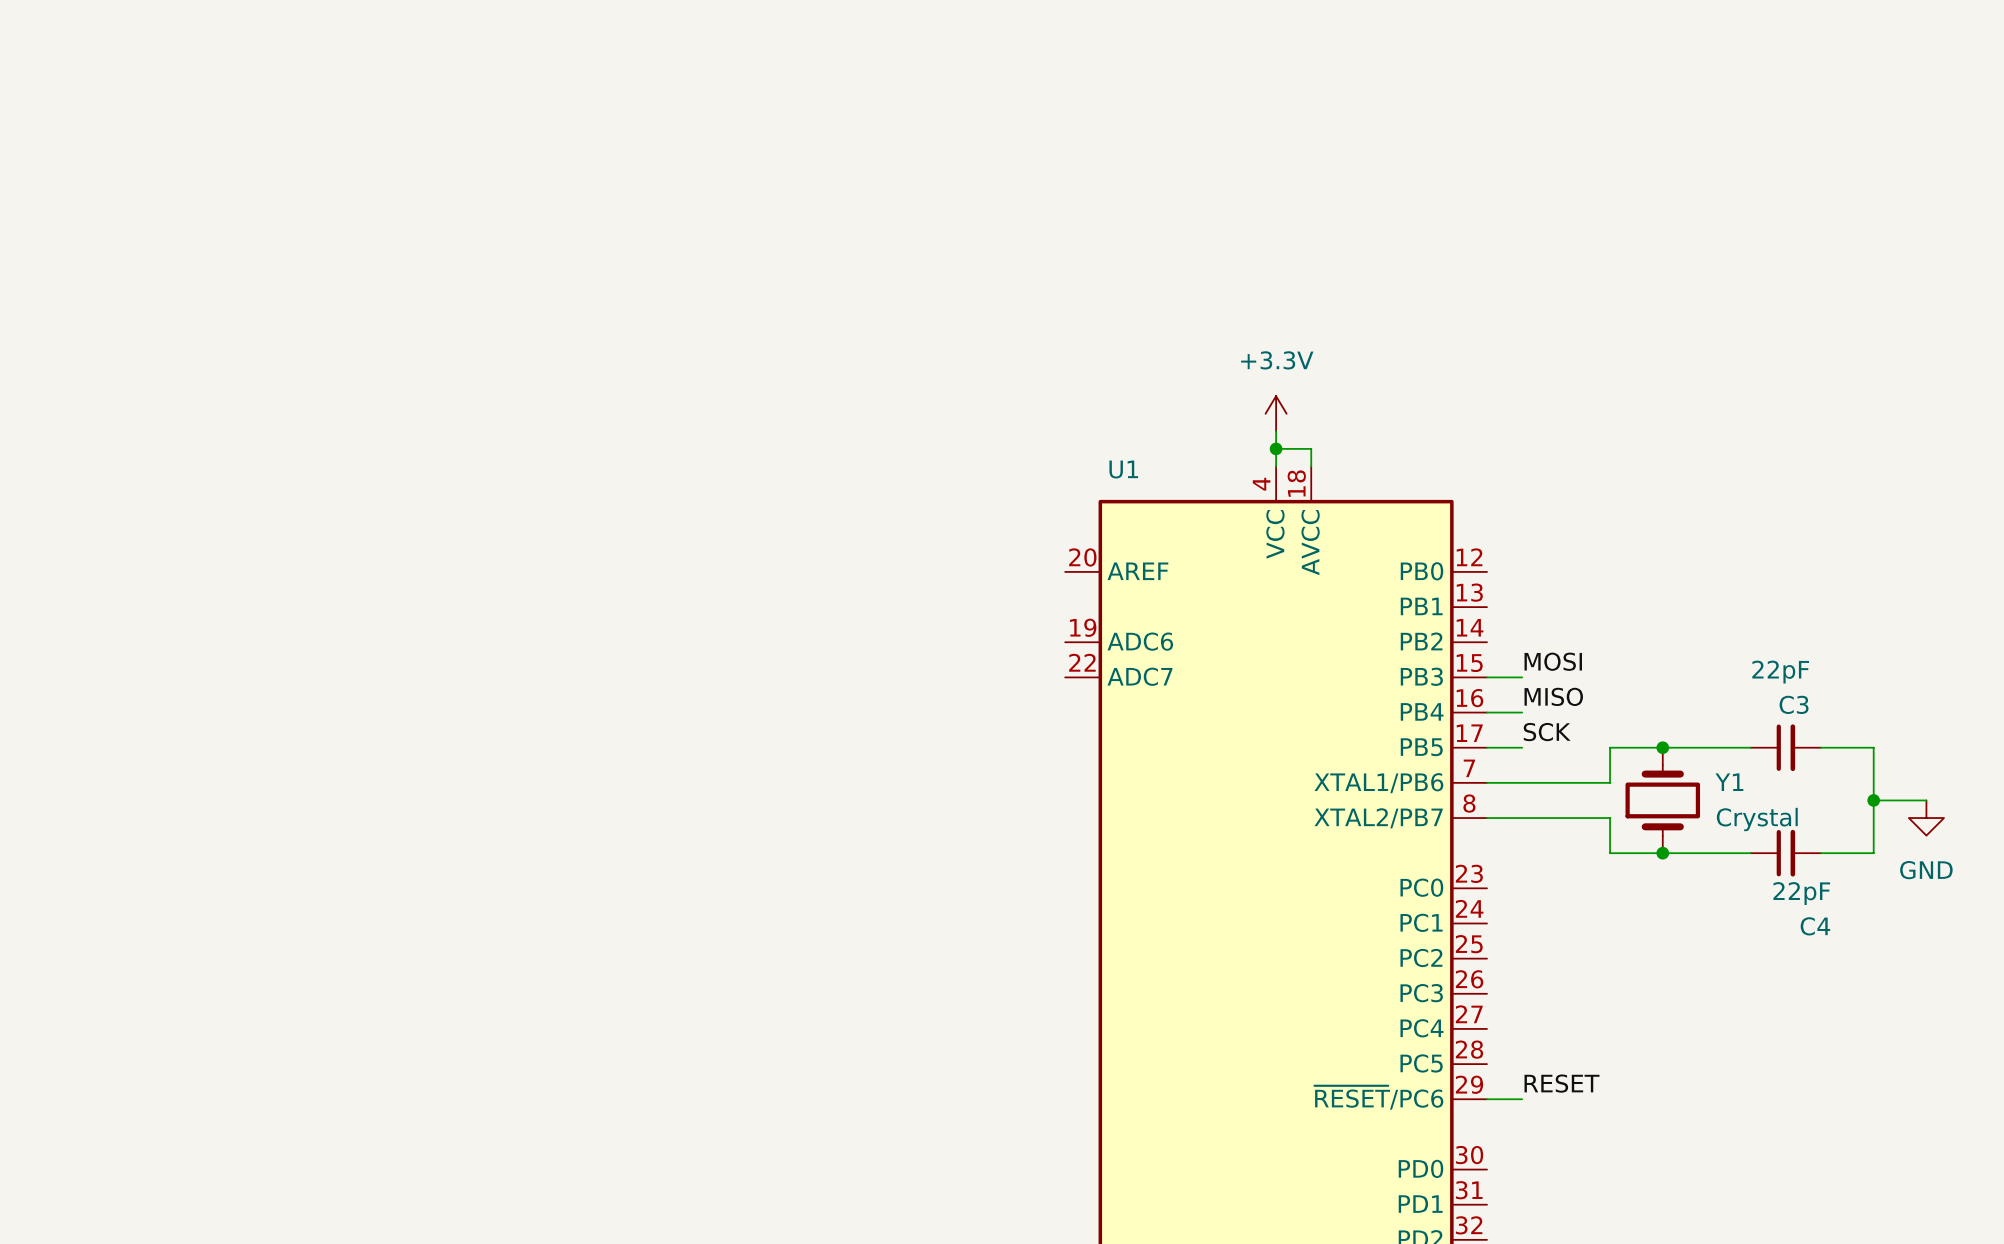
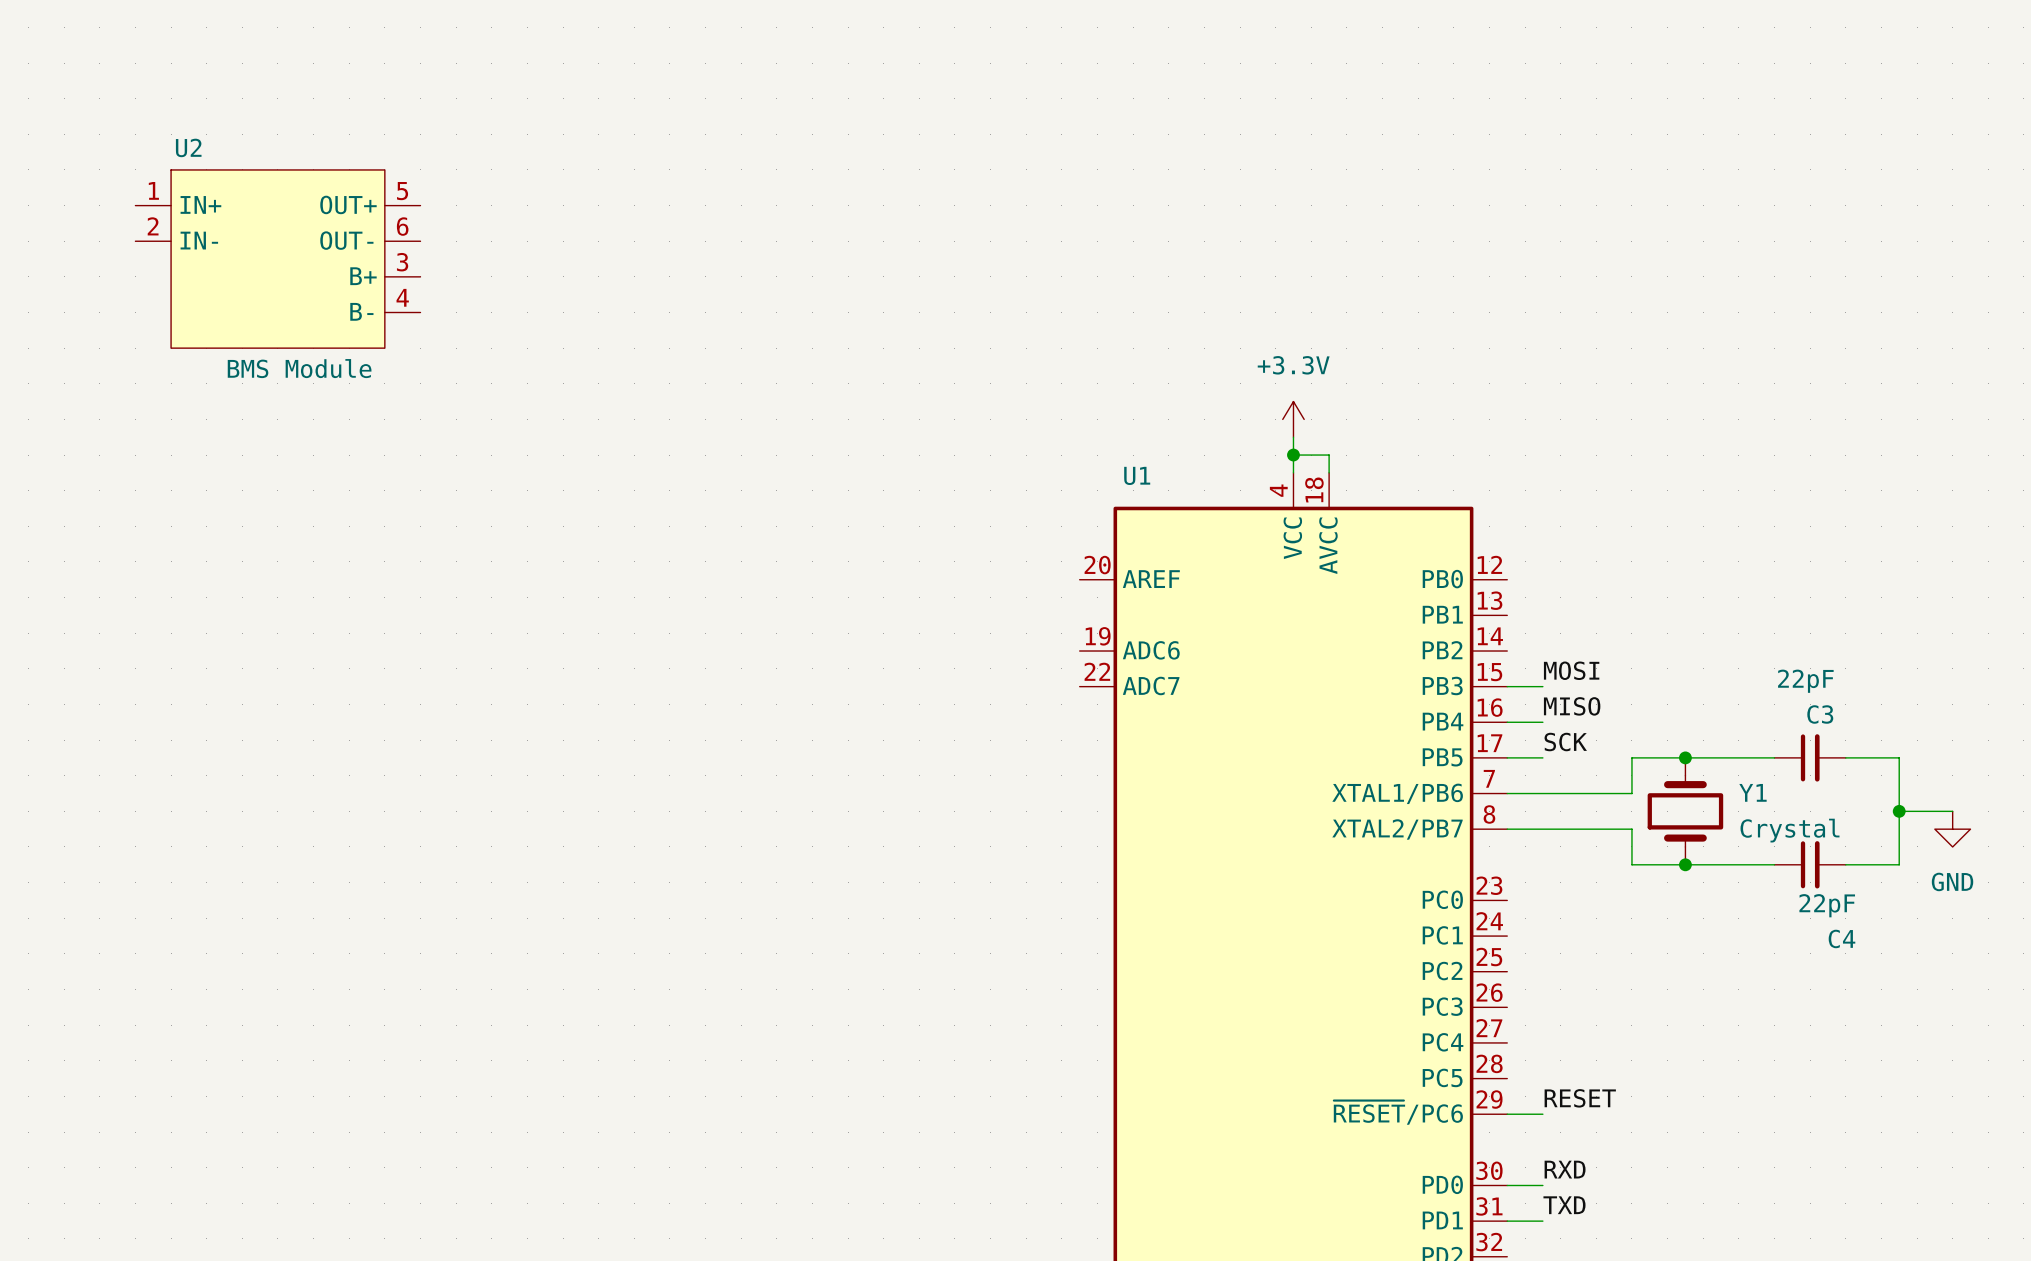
U2: none -> BMS Module (277, 259)
label: none -> RXD (1565, 1169)
wire: none -> (1507, 1185) (1542, 1185)
label: none -> TXD (1564, 1205)
wire: none -> (1507, 1221) (1542, 1221)

